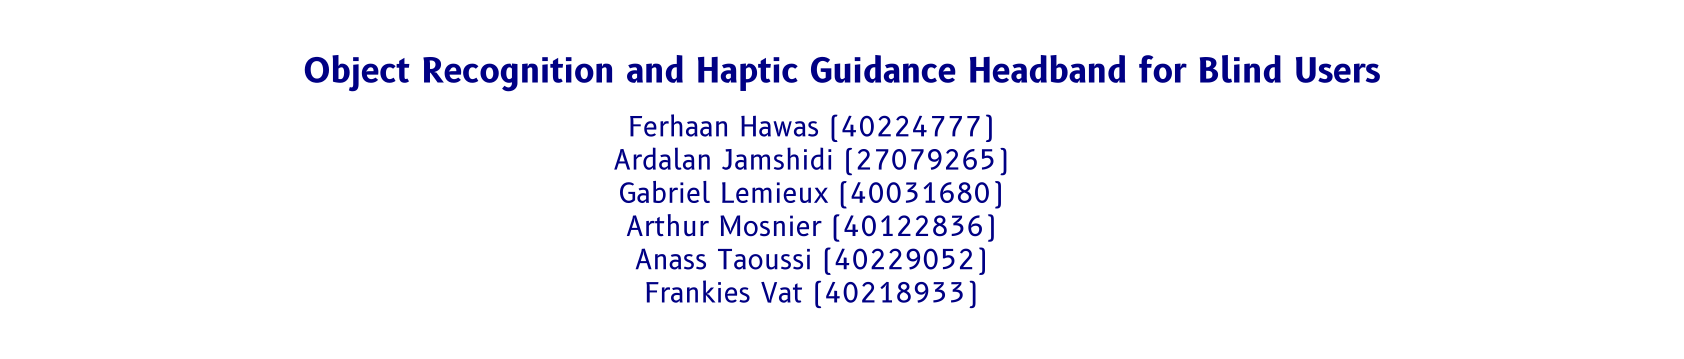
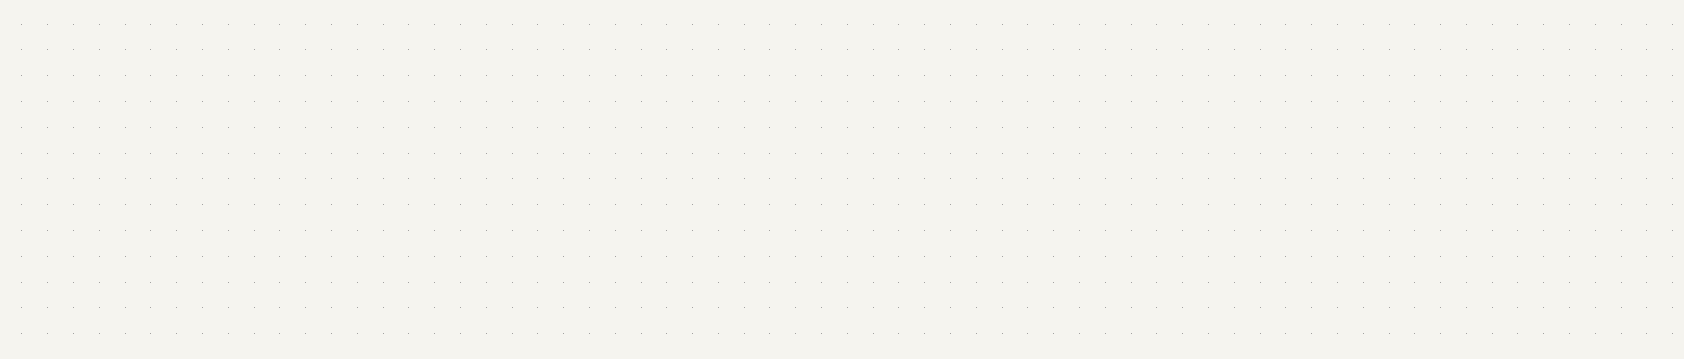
text: Object Recognition and Haptic Guidance Headband for Blind Users (842, 73) -> none
text: Ferhaan Hawas (40224777) (810, 128) -> none
text: Ardalan Jamshidi (27079265) (810, 161) -> none
text: Gabriel Lemieux (40031680) (810, 194) -> none
text: Arthur Mosnier (40122836) (810, 227) -> none
text: Anass Taoussi (40229052) (810, 261) -> none
text: Frankies Vat (40218933) (810, 294) -> none

